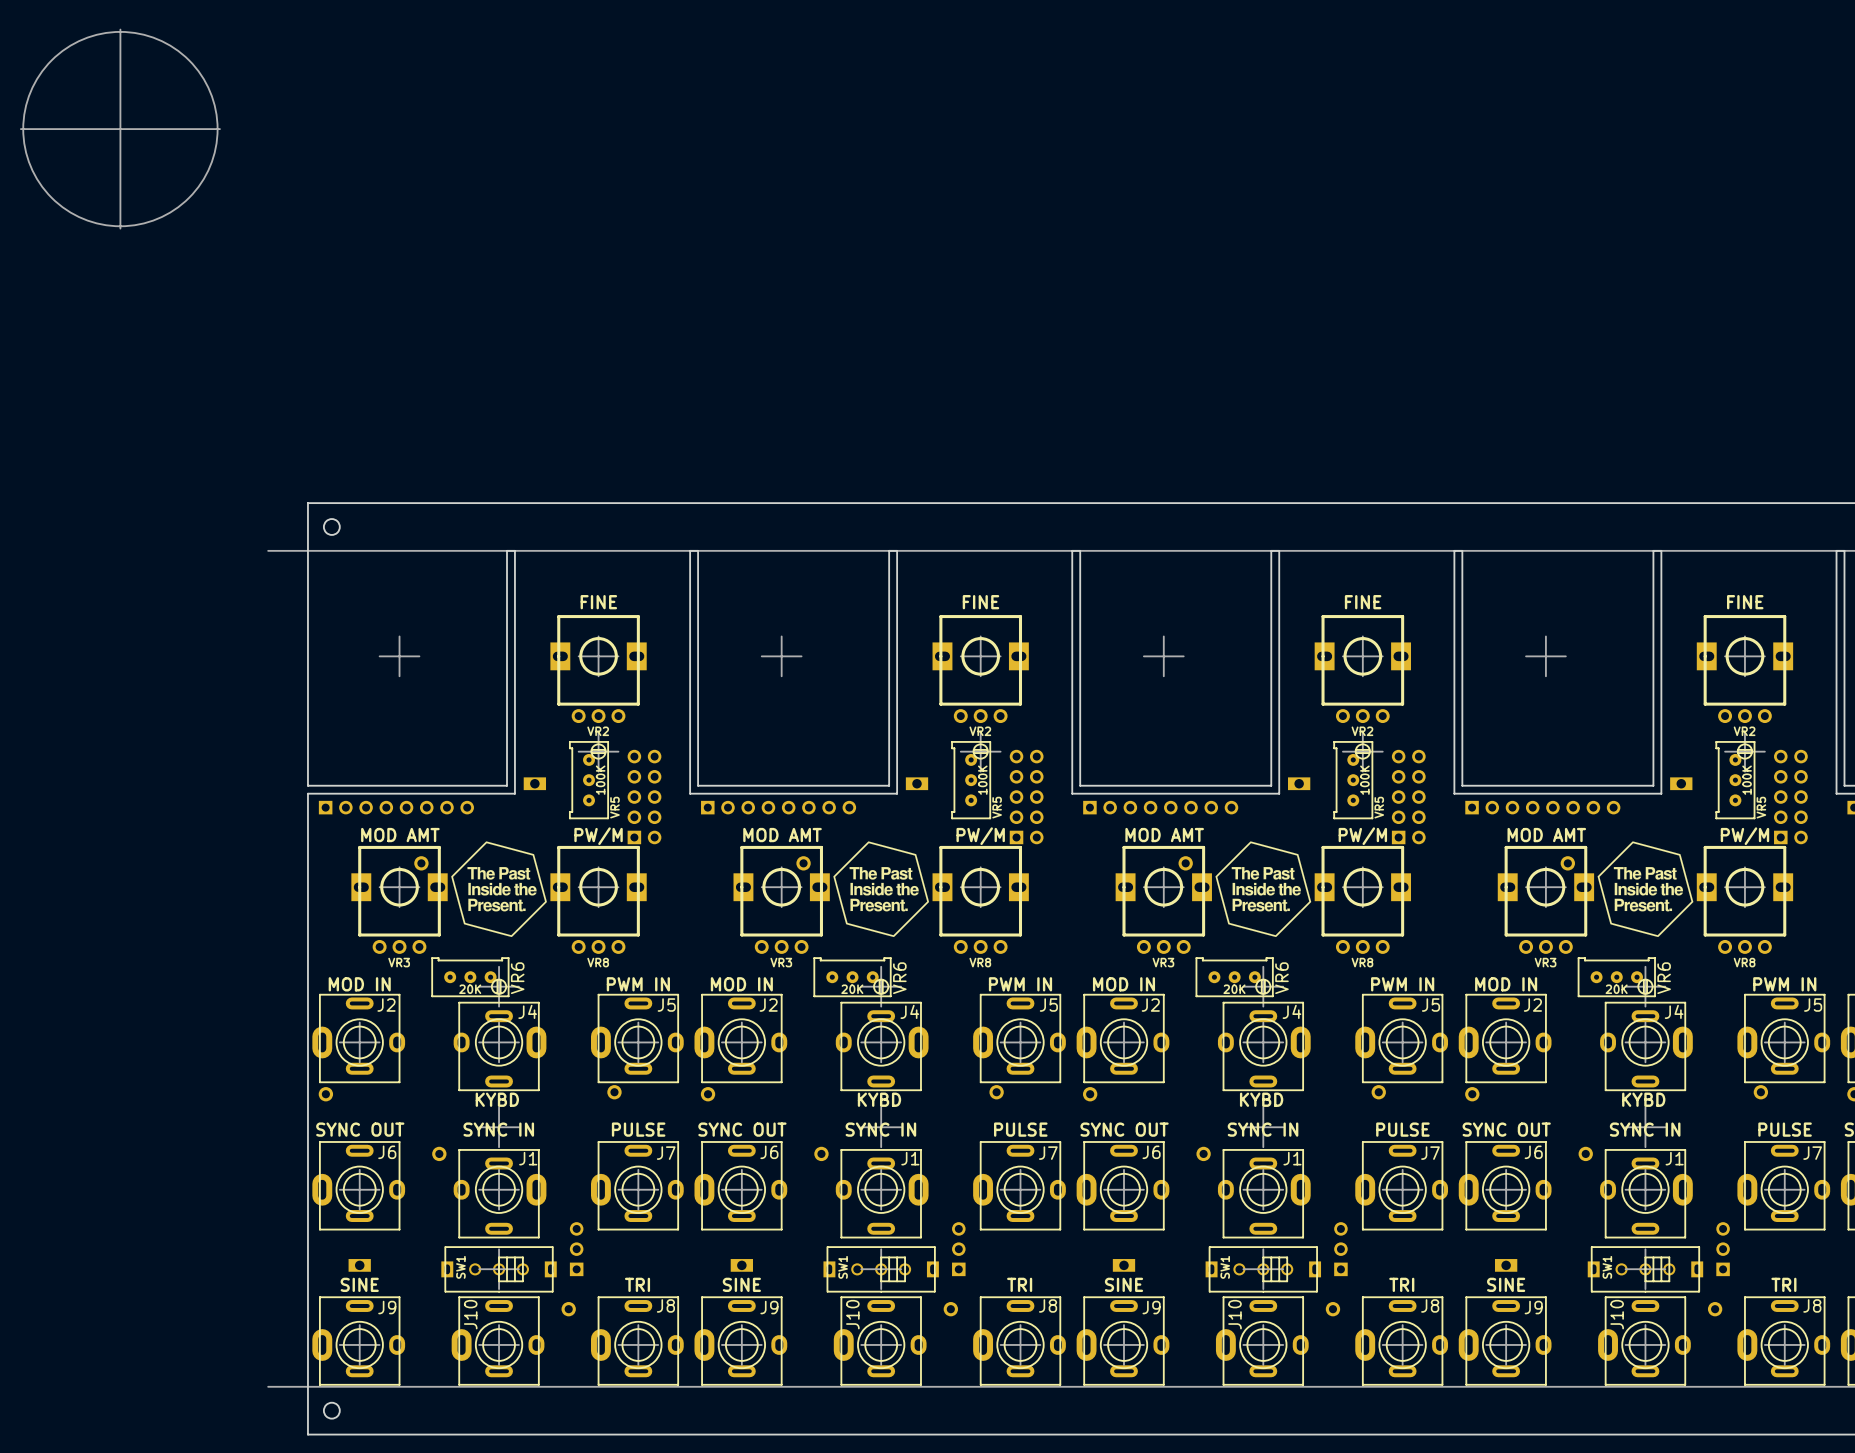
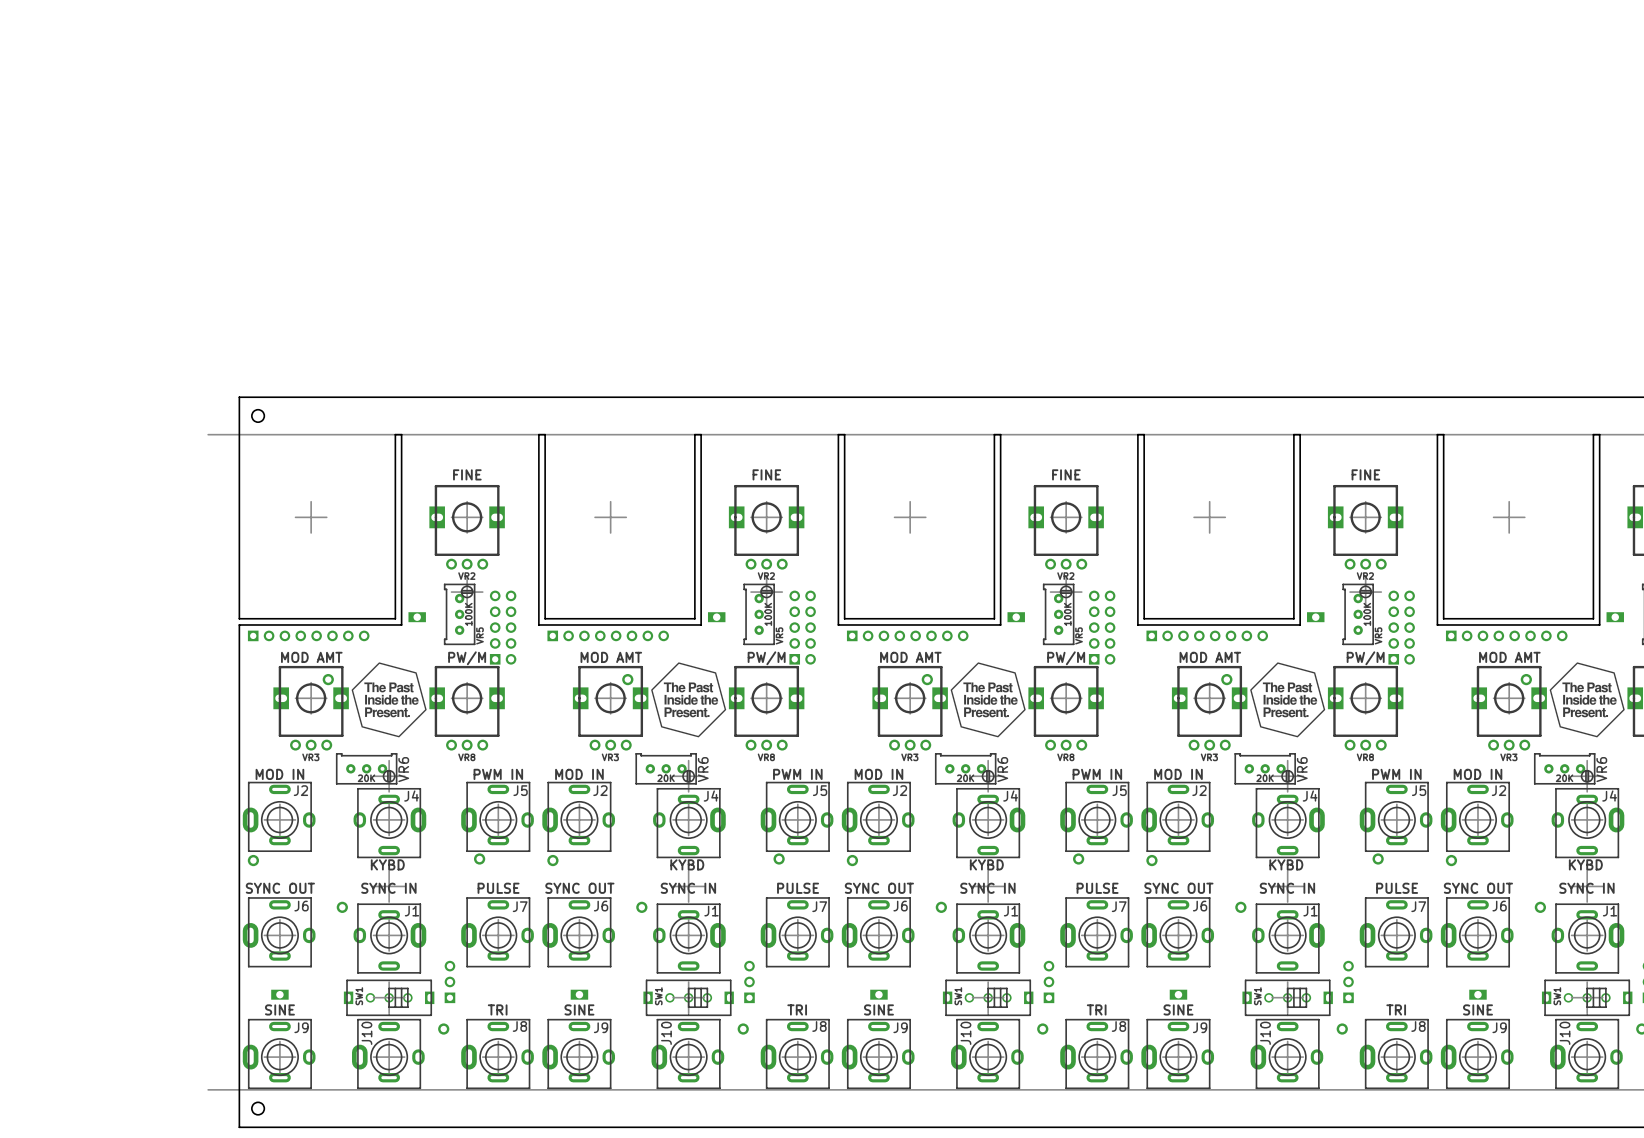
line: (120, 29) (120, 228) -> none
drawing: [22, 31, 218, 227] -> none
line: (20, 129) (219, 129) -> none

